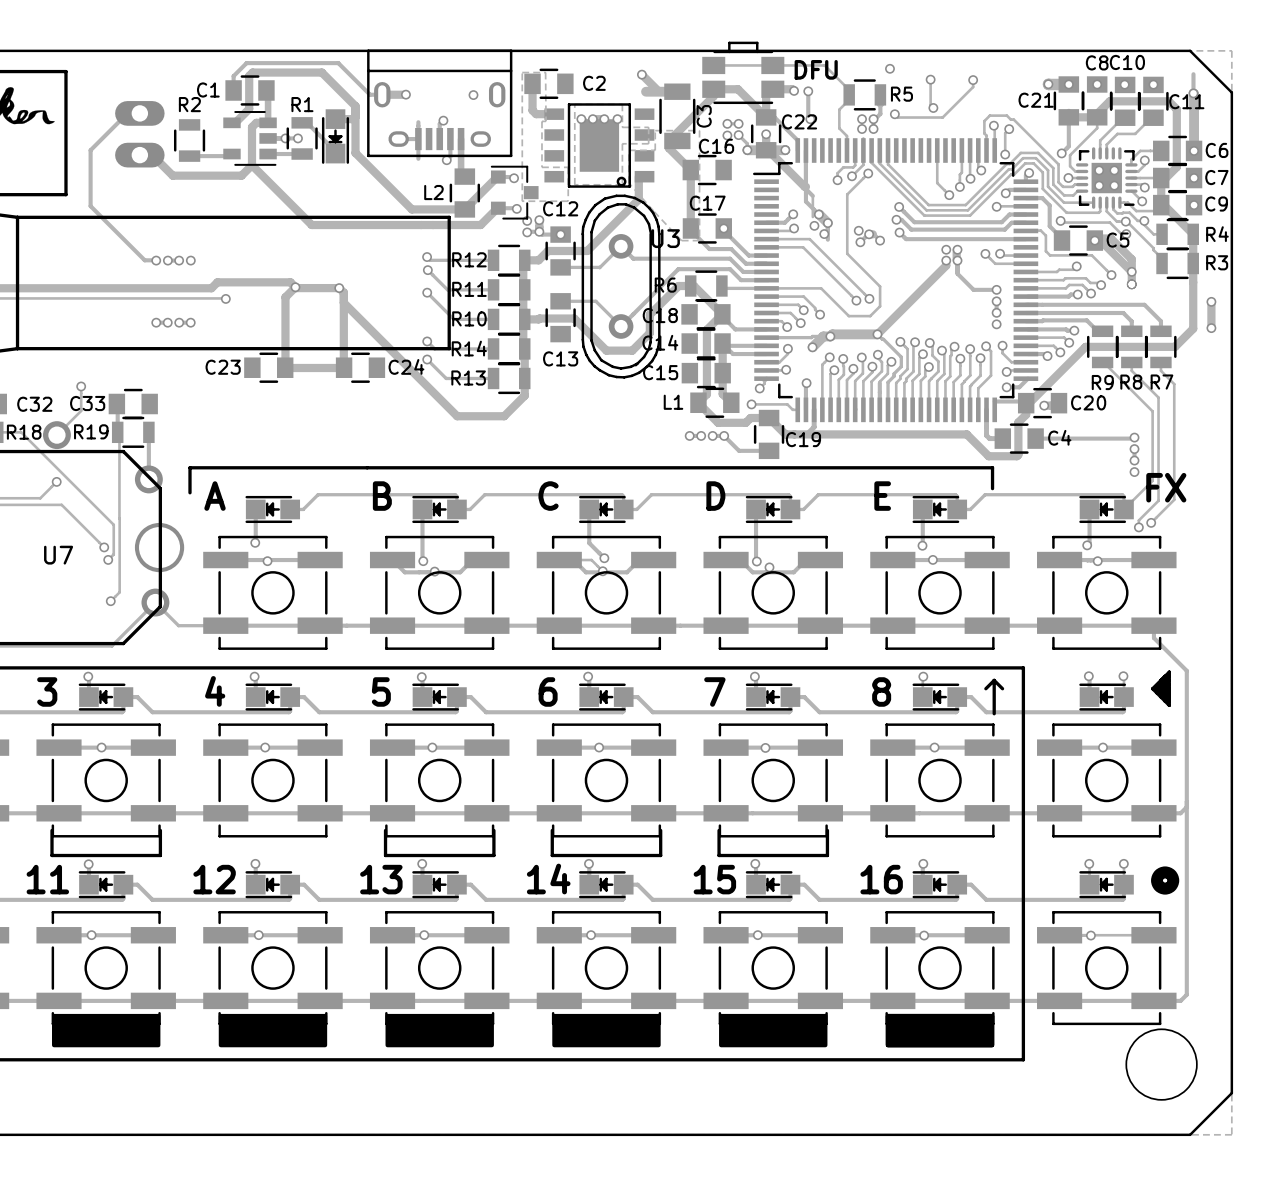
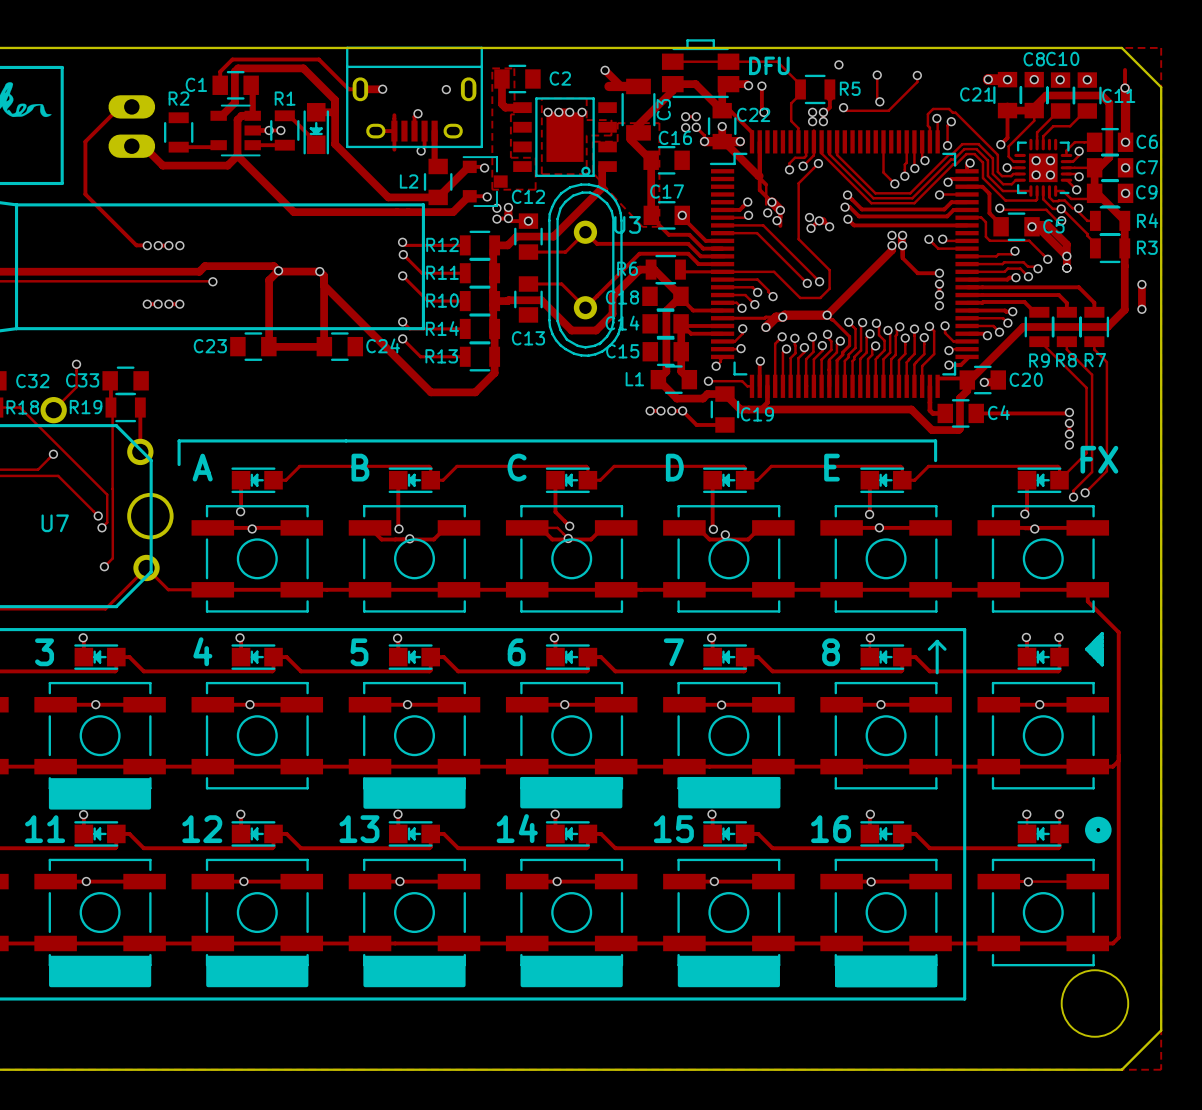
drawing: none -> [363, 777, 466, 809]
drawing: none -> [520, 776, 623, 809]
drawing: none -> [678, 776, 781, 809]
drawing: none -> [48, 778, 152, 810]
line: (52, 830) (52, 855) (160, 855) (160, 830) -> none
line: (385, 830) (385, 855) (493, 855) (493, 830) -> none
line: (552, 830) (552, 855) (660, 855) (660, 830) -> none
line: (719, 830) (719, 855) (827, 855) (827, 830) -> none

